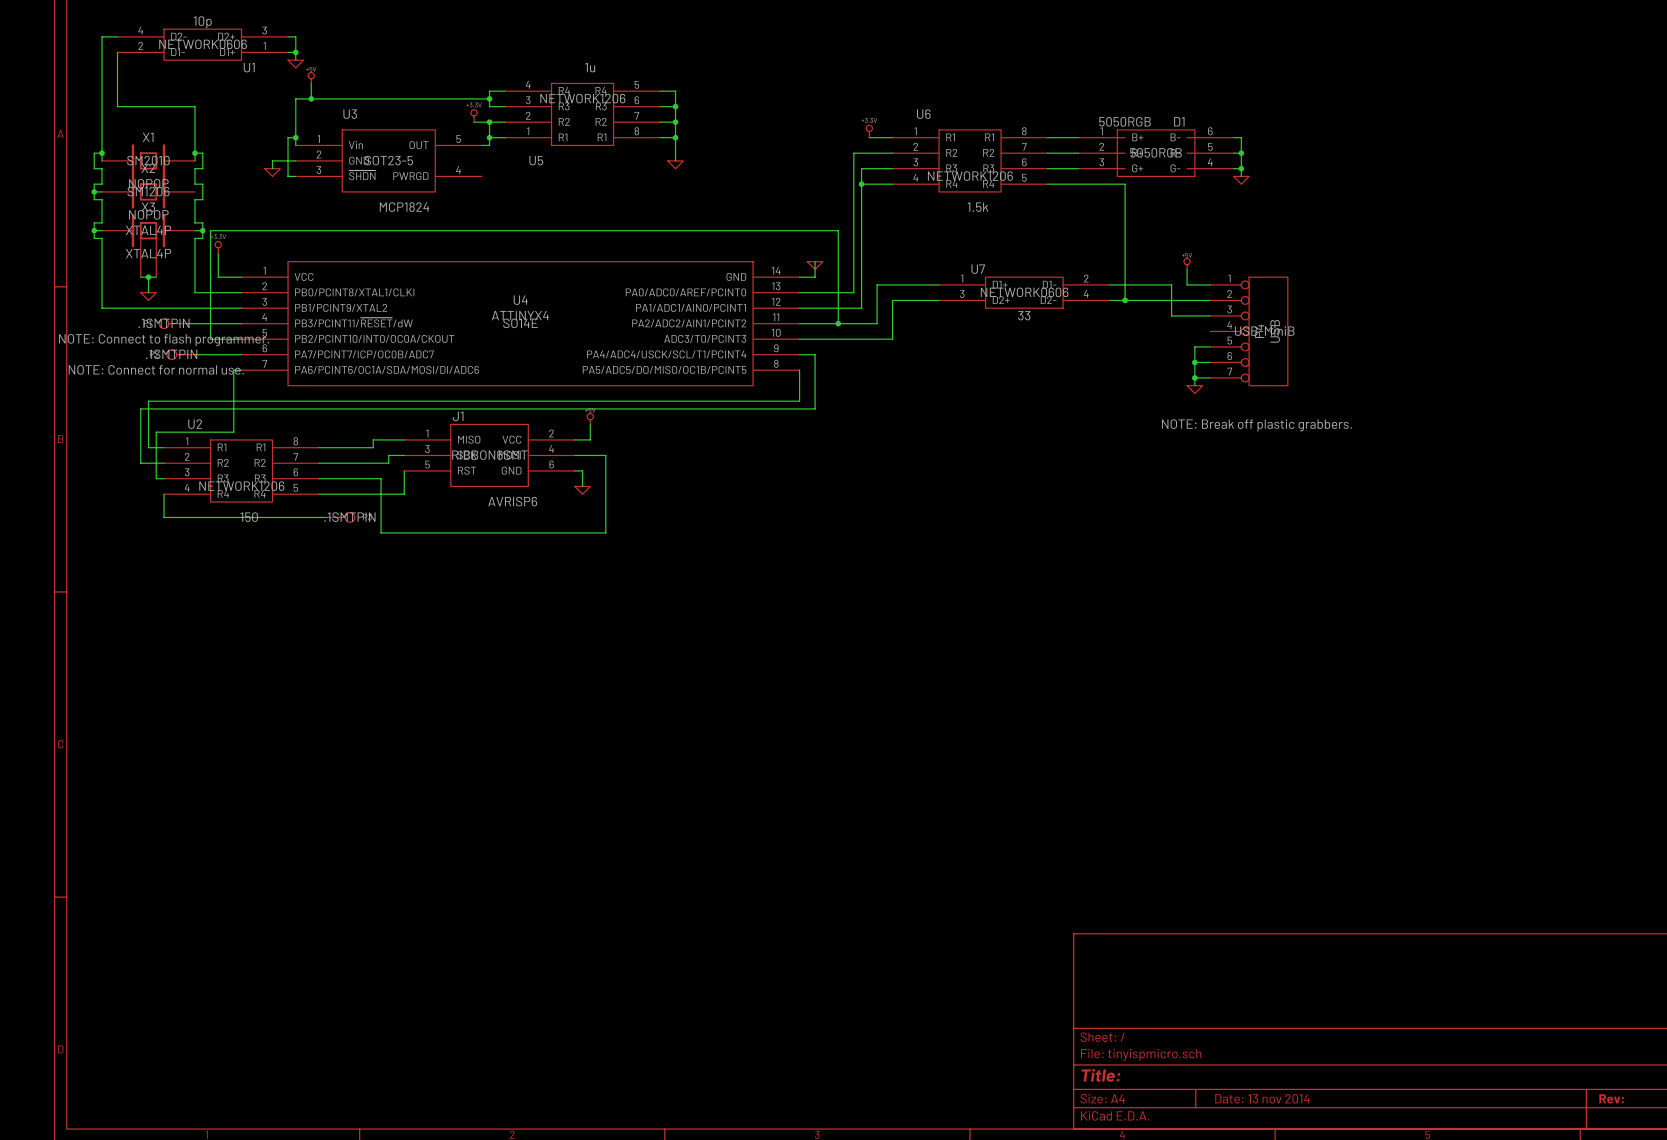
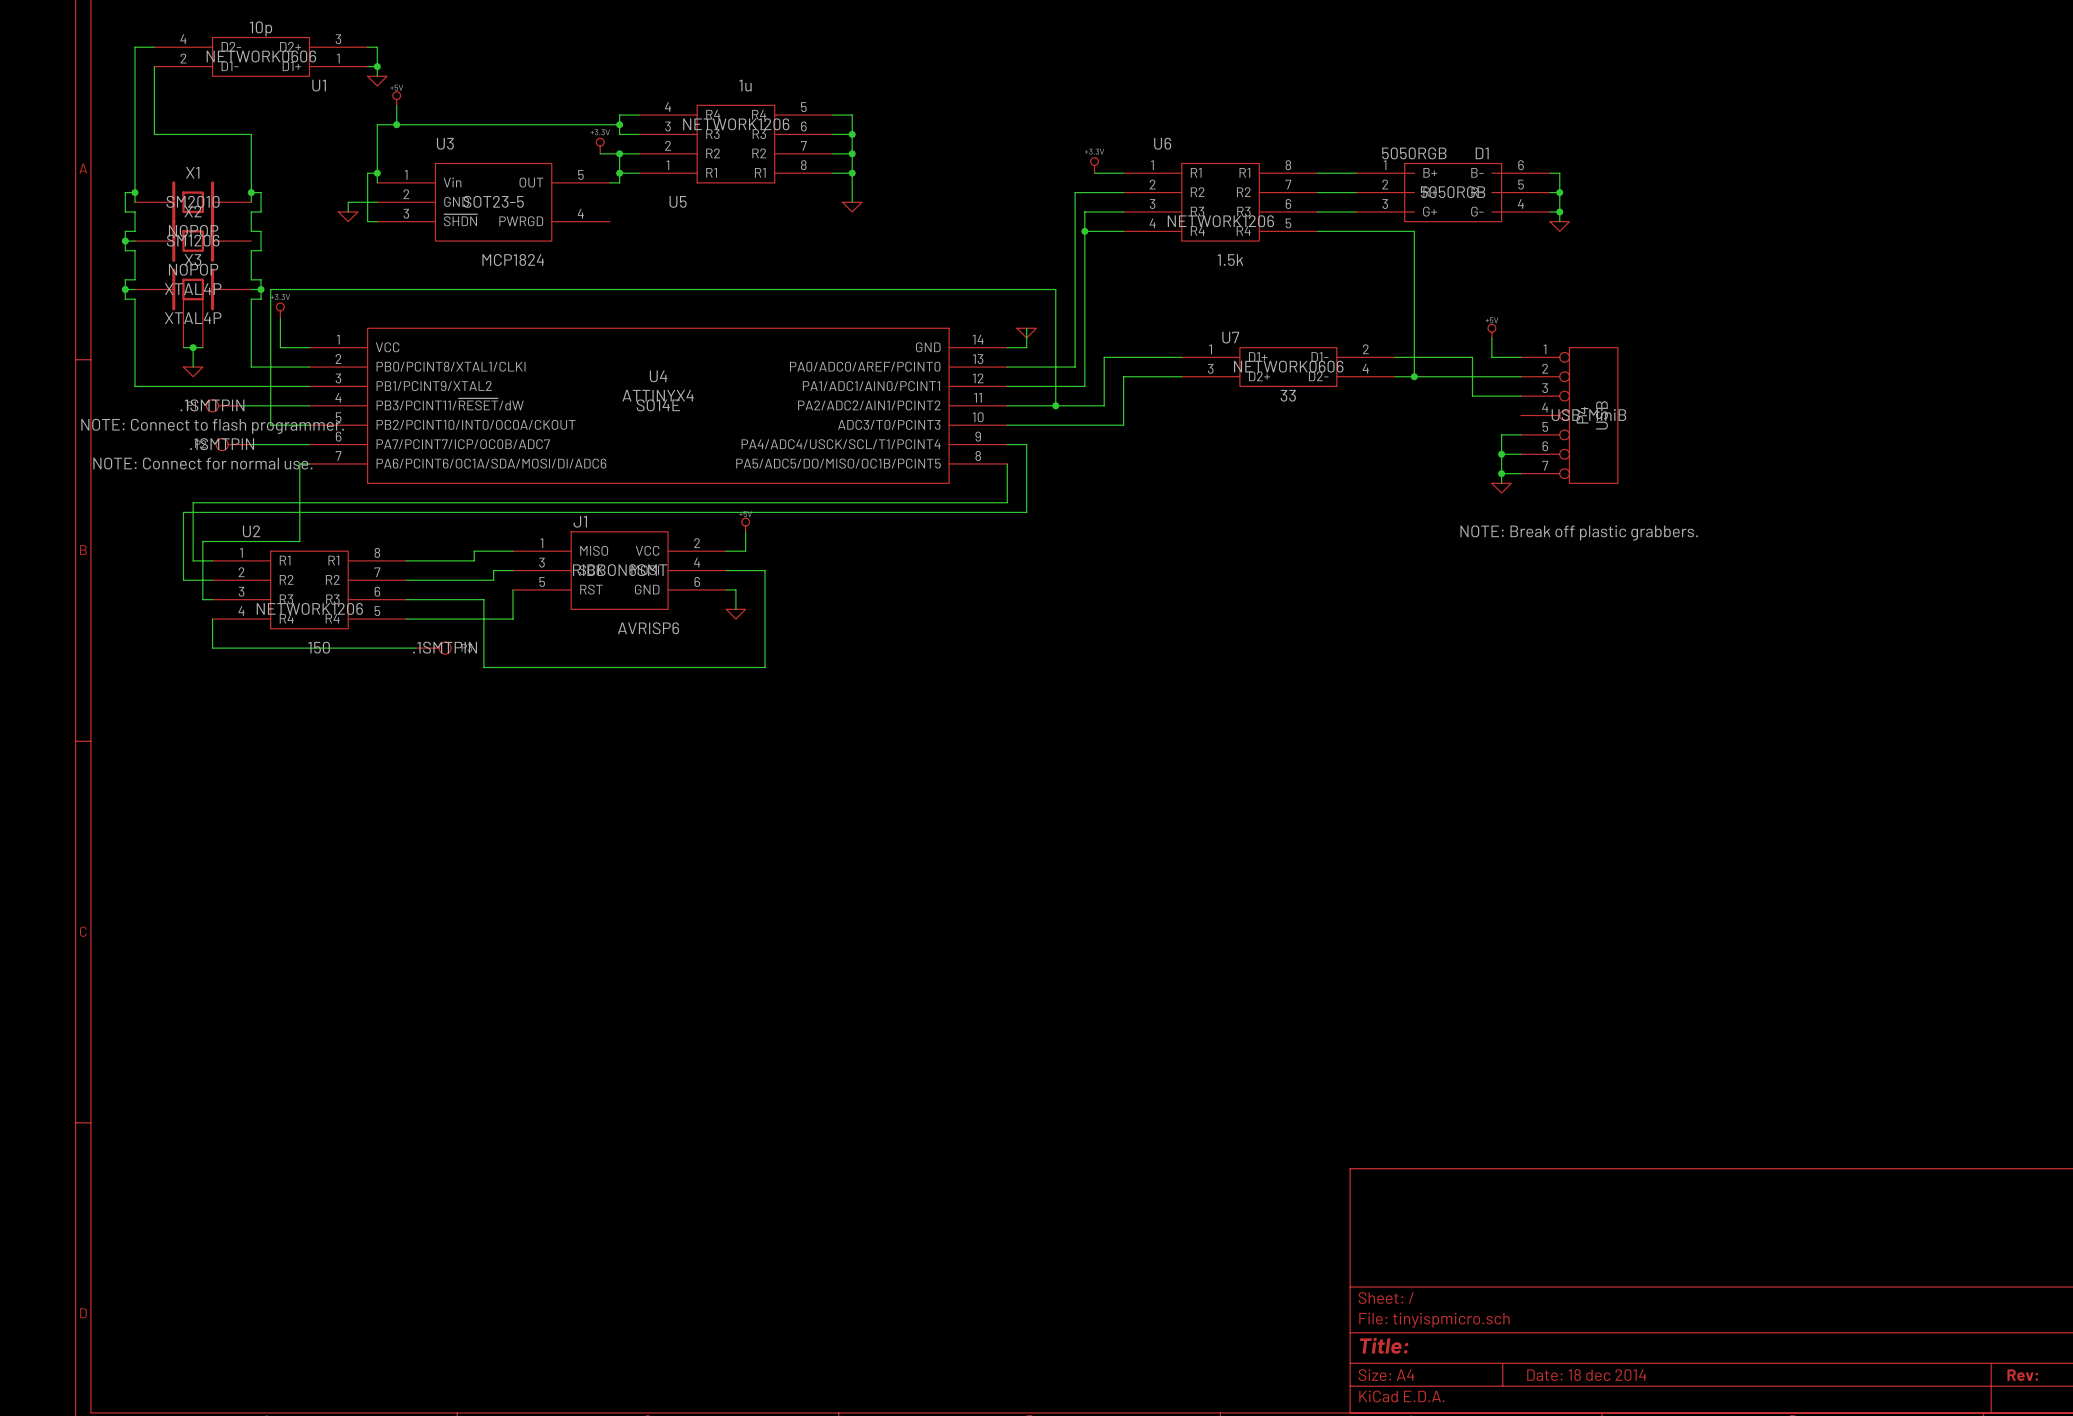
title block: Date: 13 nov 2014 (1262, 1098) -> Date: 18 dec 2014 (1586, 1375)

